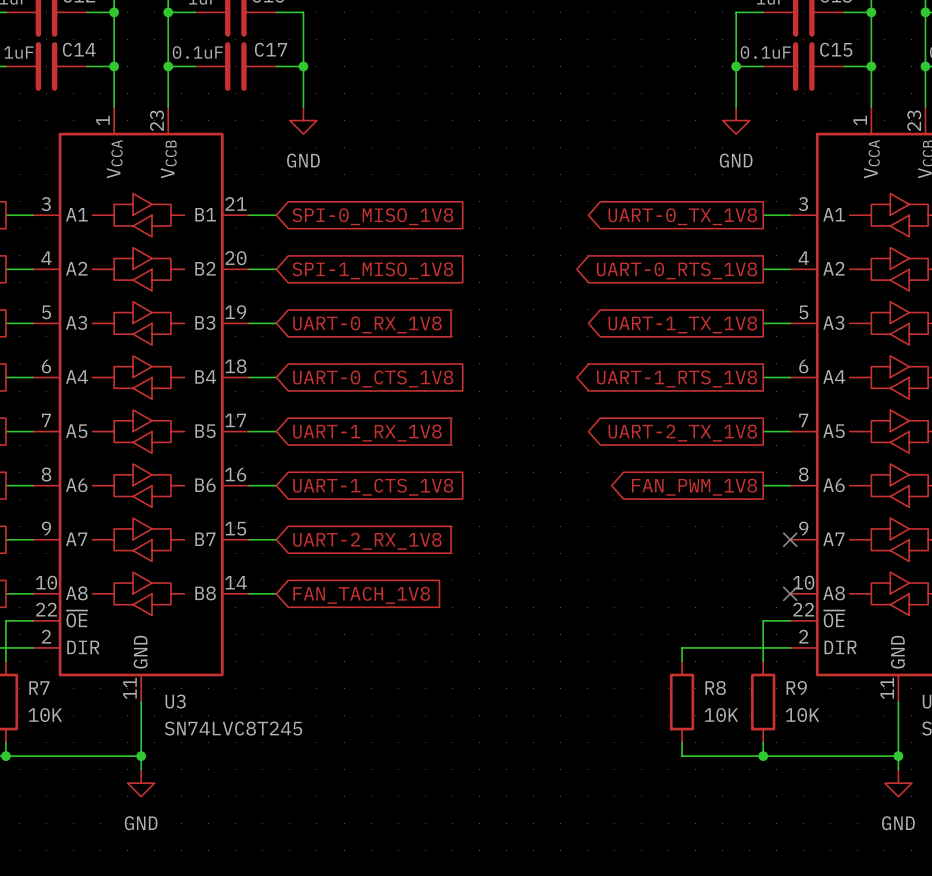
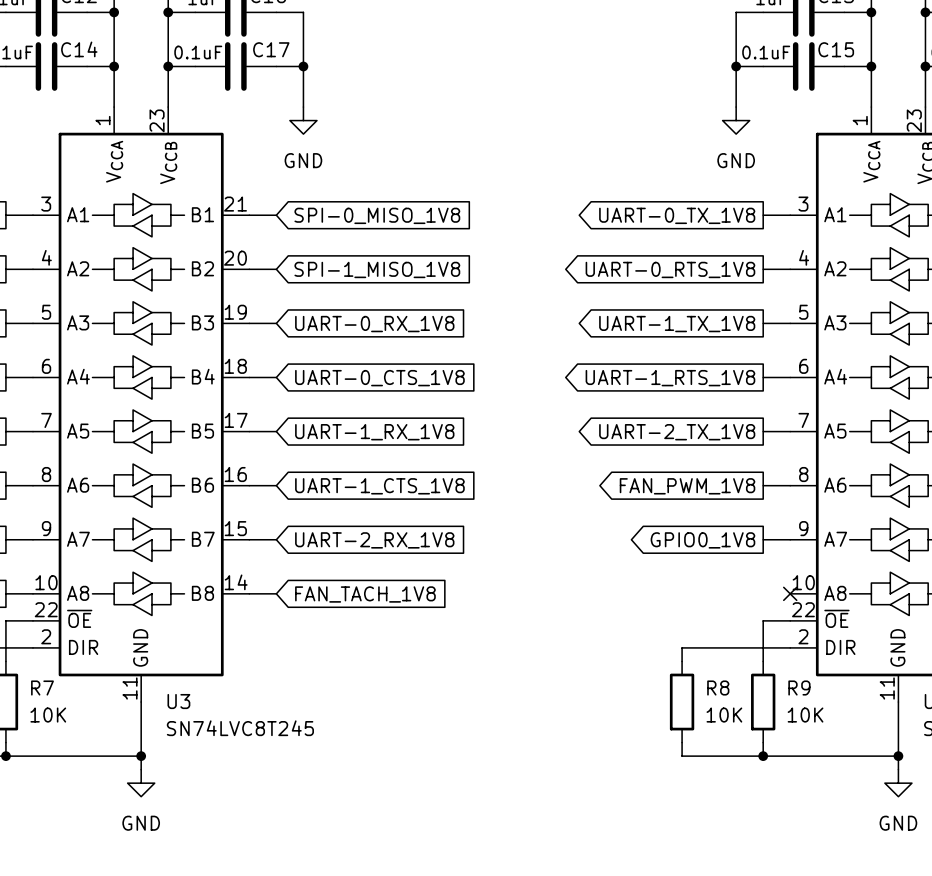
wire: none -> (763, 539) (790, 539)
no-connect mark: (790, 539) -> none
global label: none -> GPIO0_1V8 (702, 540)

